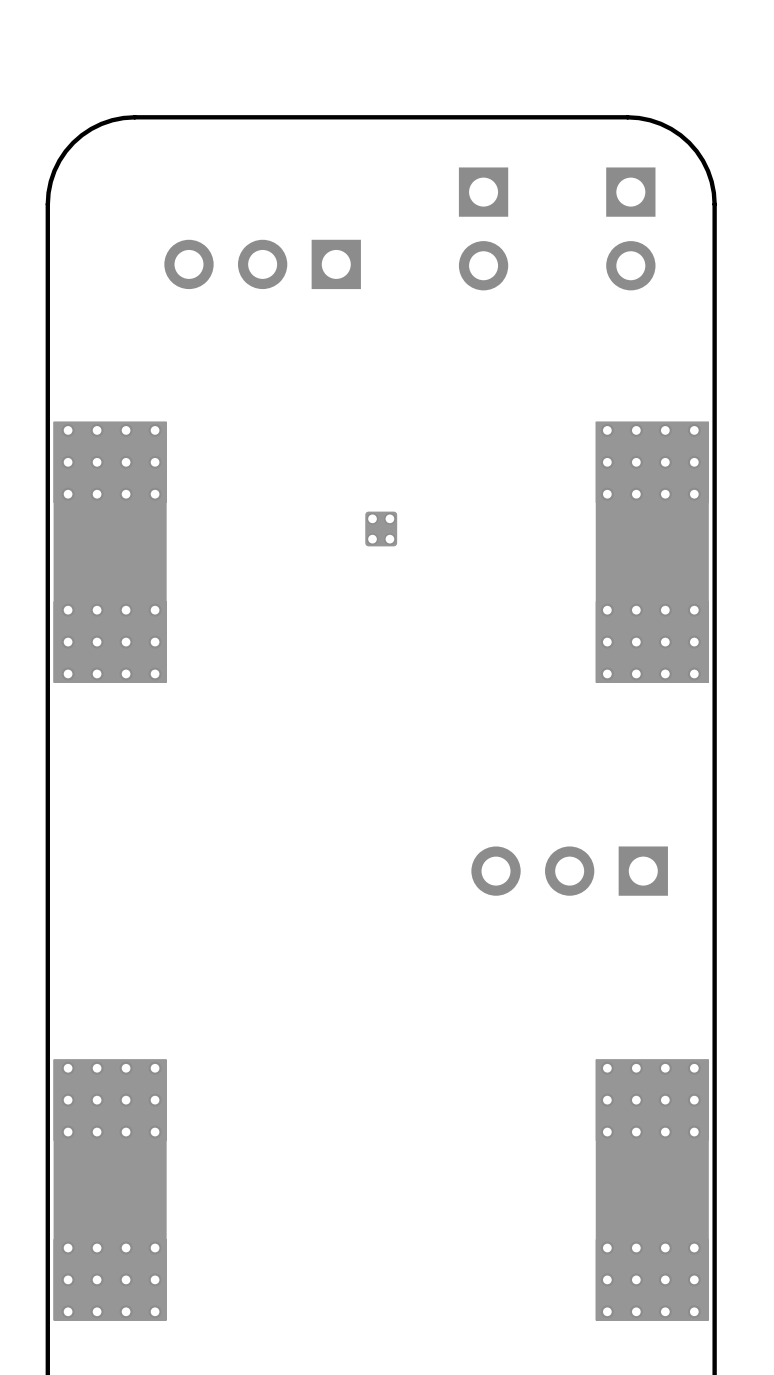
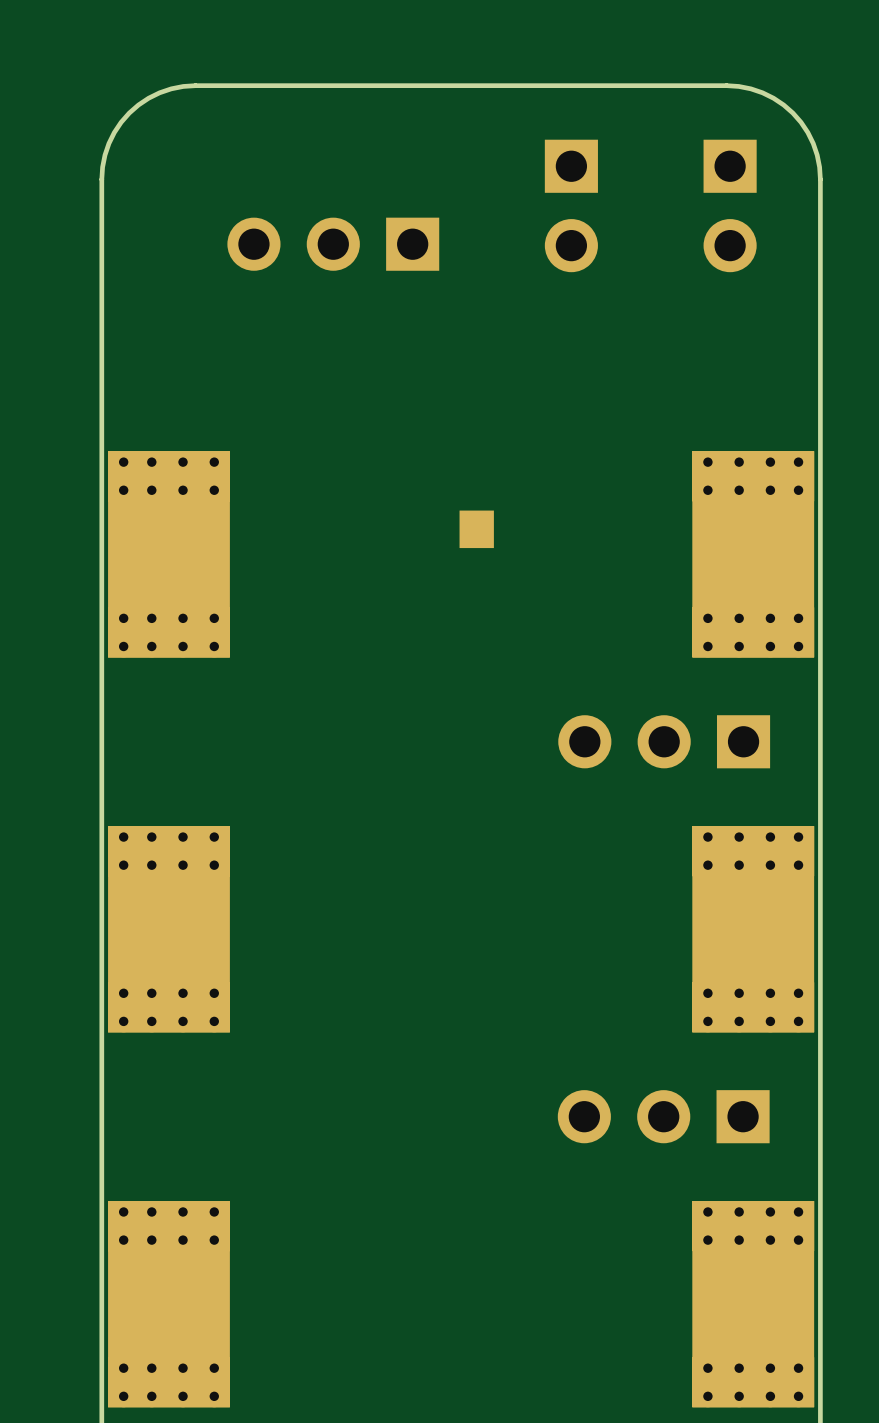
part footprint: [53, 421, 167, 683] -> [108, 451, 230, 658]
part footprint: [595, 421, 709, 683] -> [692, 451, 815, 658]
part footprint: [365, 511, 398, 547] -> [459, 510, 494, 549]
part: none -> (664, 741)
part: (569, 871) -> none
part: none -> (168, 929)
part: none -> (753, 929)
part: none -> (663, 1116)
part: (110, 1190) -> none
part: (652, 1190) -> none
part: none -> (168, 1304)
part: none -> (753, 1304)

